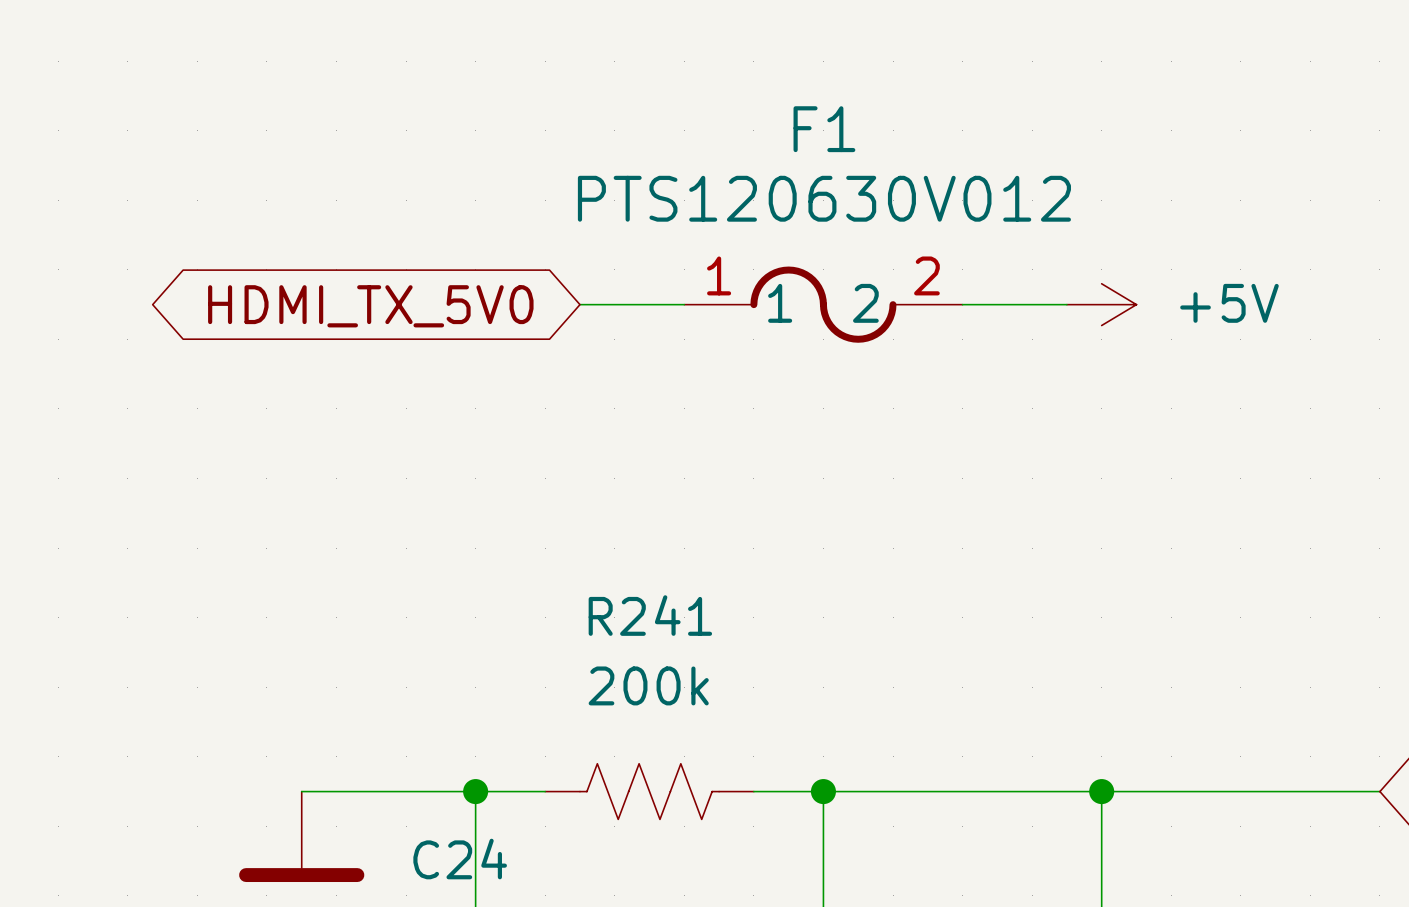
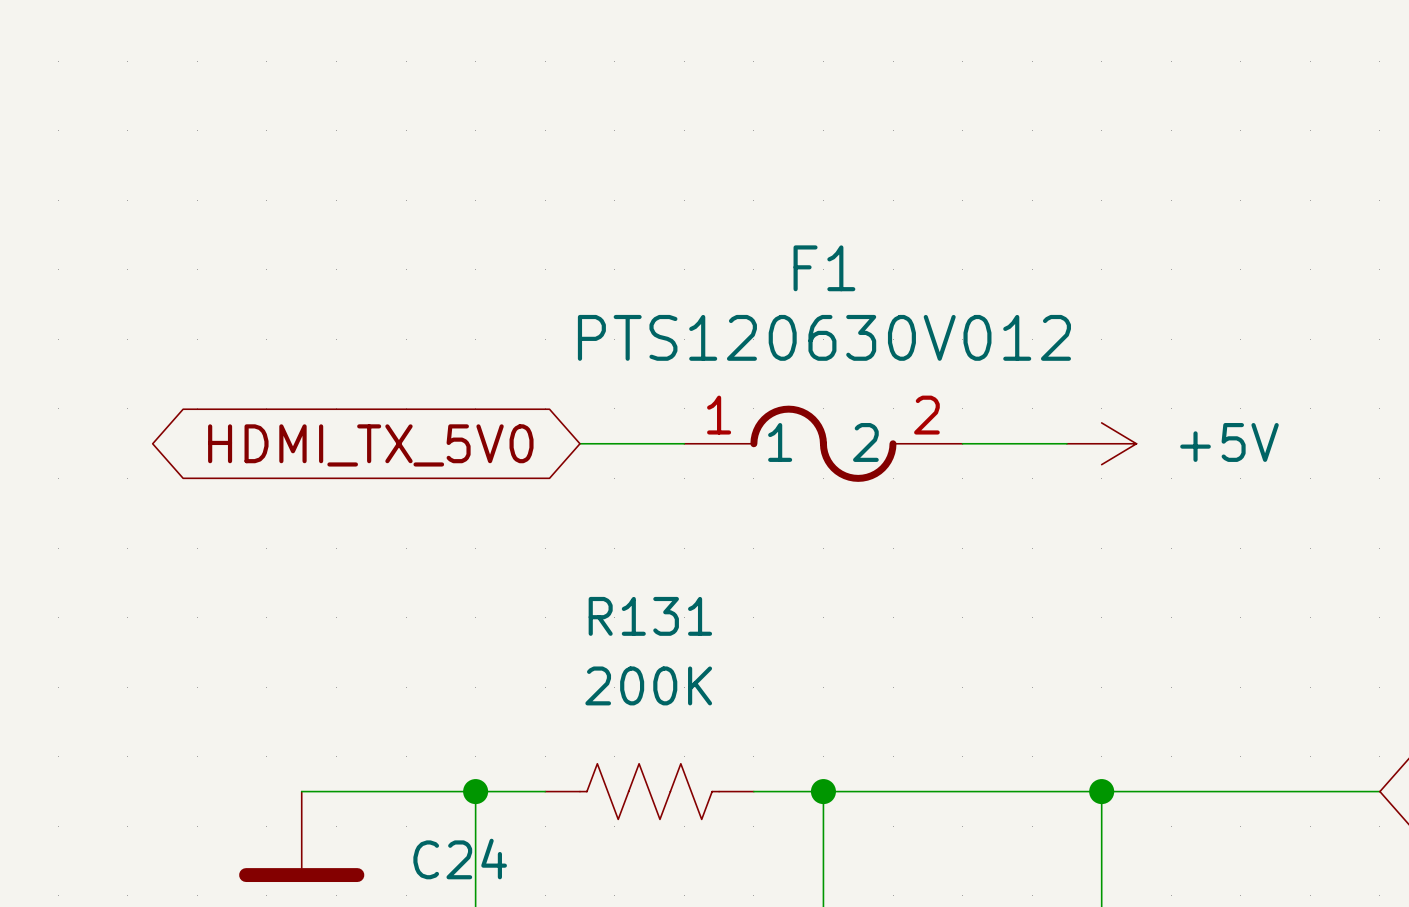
wire: (579, 304) (684, 304) -> (579, 443) (684, 443)
F1 position: (823, 304) -> (823, 443)
wire: (962, 304) (1066, 304) -> (962, 443) (1066, 443)
power symbol position: +5V (1101, 304) -> +5V (1101, 443)
global label position: HDMI_TX_5V0 (370, 306) -> HDMI_TX_5V0 (370, 445)
R241 name: R241 (650, 615) -> R131 (650, 616)
R241 value: 200k (648, 685) -> 200K (648, 685)

